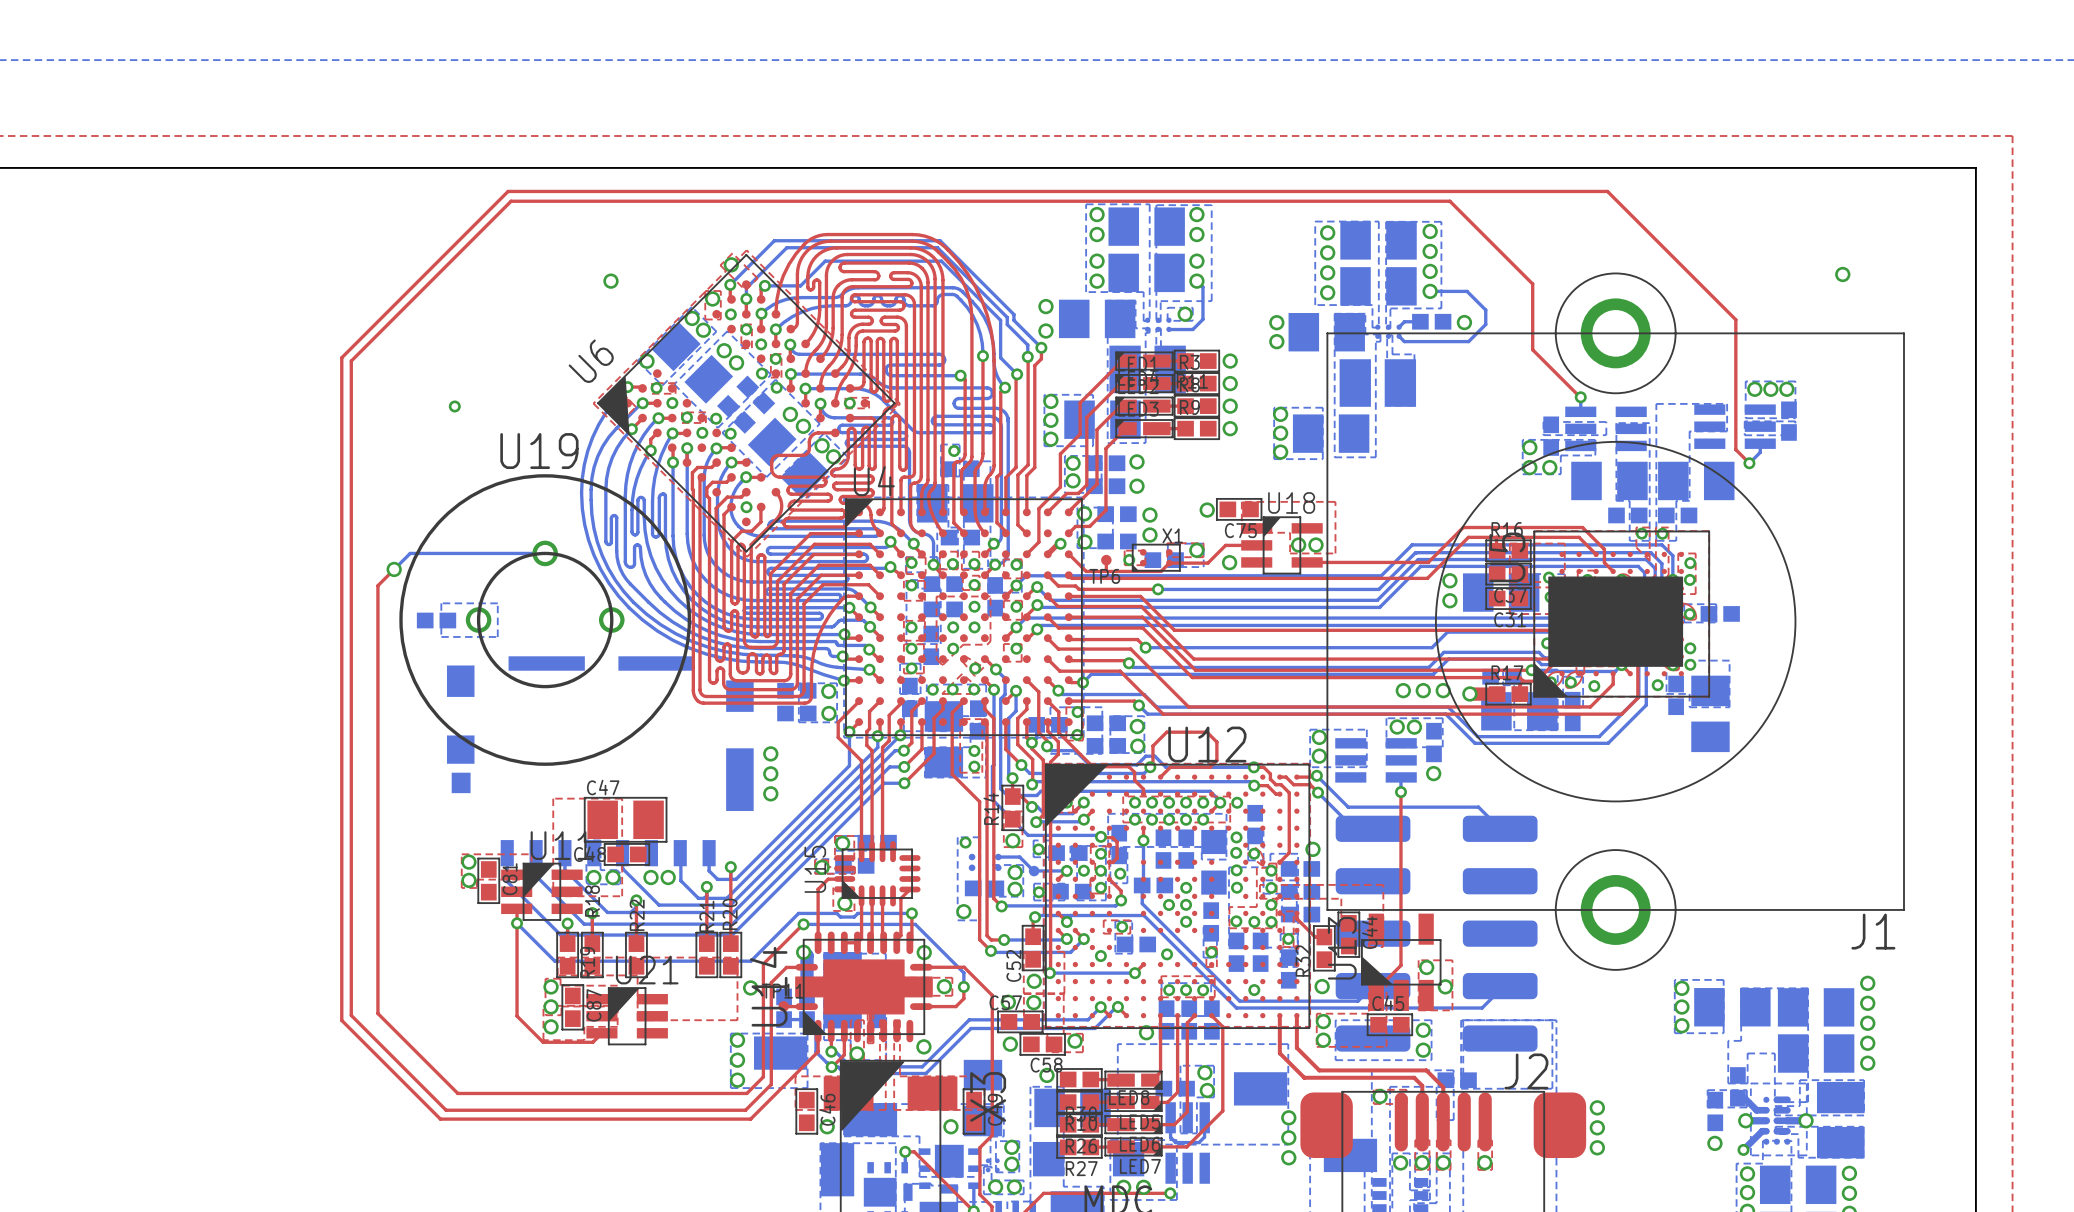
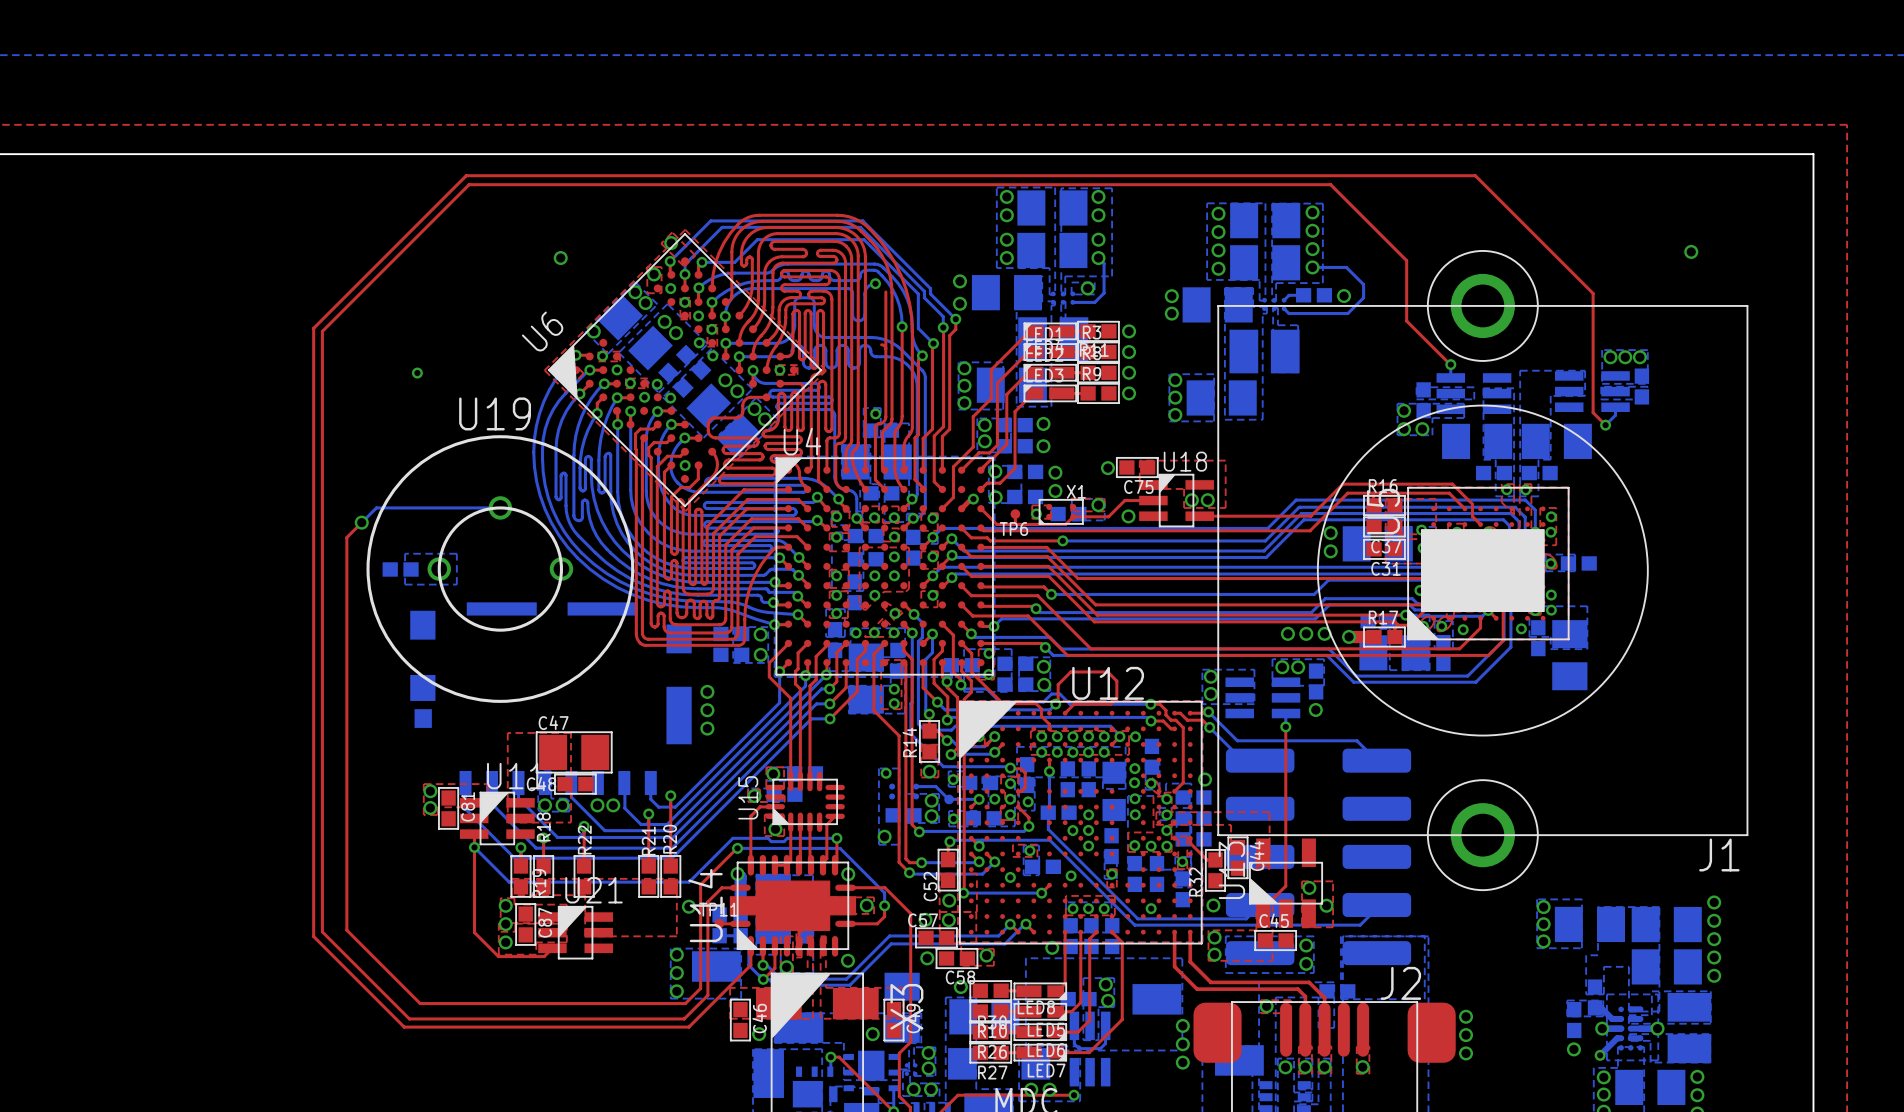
bottom track: (790, 344) (793, 351) (799, 354) (939, 354) (944, 359) (940, 364) (890, 365) (886, 367) (886, 371) (891, 375) (960, 375) -> (725, 316) (731, 299) (745, 289) (847, 288) (852, 292) (853, 317) (856, 320) (860, 320) (864, 315) (865, 290) (869, 285) (875, 283)
bottom track: (846, 374) (866, 374) (890, 387) (988, 388) (992, 392) (989, 397) (957, 398) (954, 401) (954, 405) (958, 408) (998, 408) (1005, 413) (1008, 420) -> (776, 343) (785, 340) (793, 332) (795, 299) (799, 297) (810, 298) (814, 301) (814, 326) (819, 335) (823, 337) (876, 337) (887, 340) (897, 346) (923, 371) (925, 383)
via position: (960, 375) -> (875, 283)
bottom track: (854, 388) (870, 391) (879, 397) (916, 432) (990, 432) (993, 429) (990, 424) (935, 424) (932, 420) (936, 416) (988, 416) (998, 420) (1001, 427) (1001, 536) (999, 541) (993, 543) -> (783, 356) (790, 355) (794, 346) (800, 345) (803, 350) (803, 364) (810, 367) (814, 364) (815, 348) (821, 345) (825, 349) (826, 364) (832, 367) (836, 364) (837, 348) (843, 345) (848, 349) (849, 365) (854, 367) (859, 364) (860, 348) (866, 345) (869, 347) (874, 356) (894, 357) (908, 365) (914, 375) (917, 387) (917, 493) (915, 497) (912, 499)

